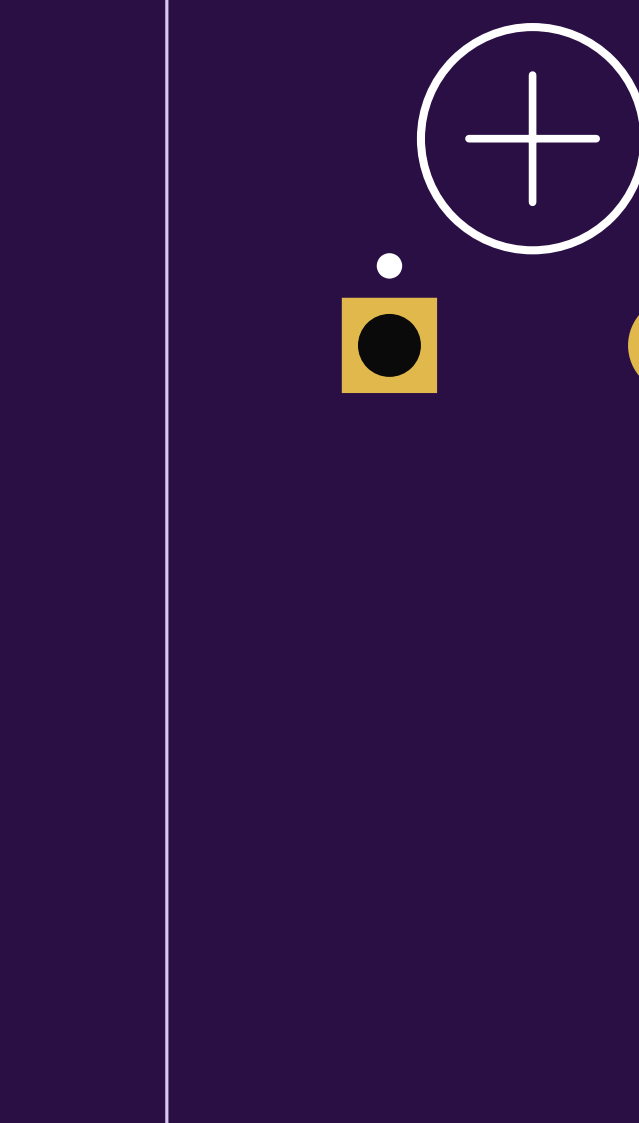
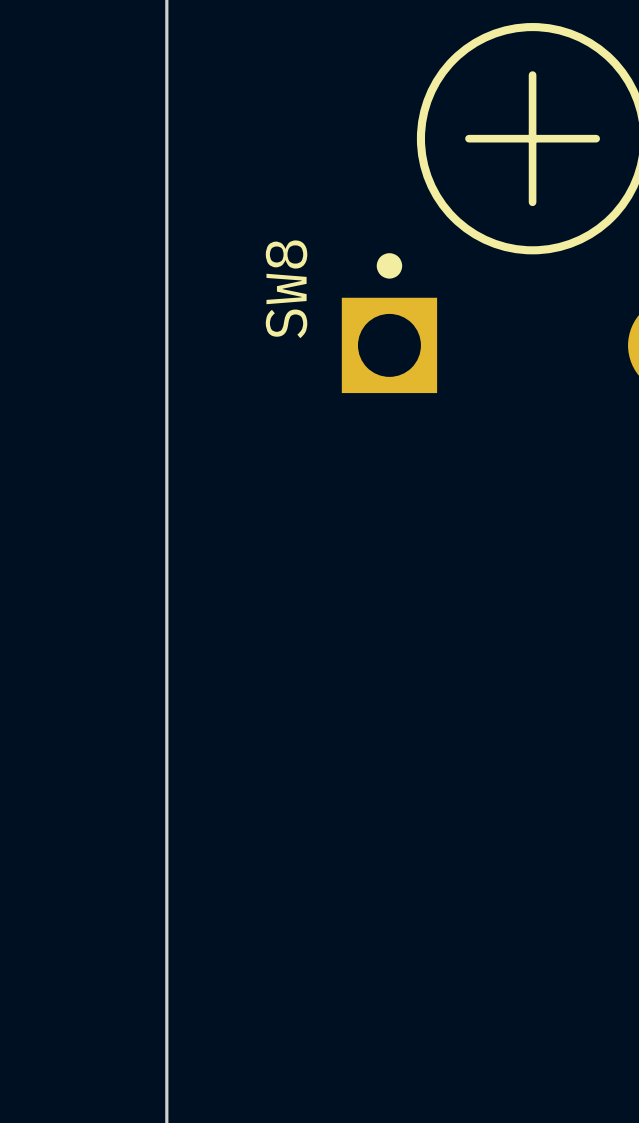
SW8 name: none -> SW8 (286, 289)

